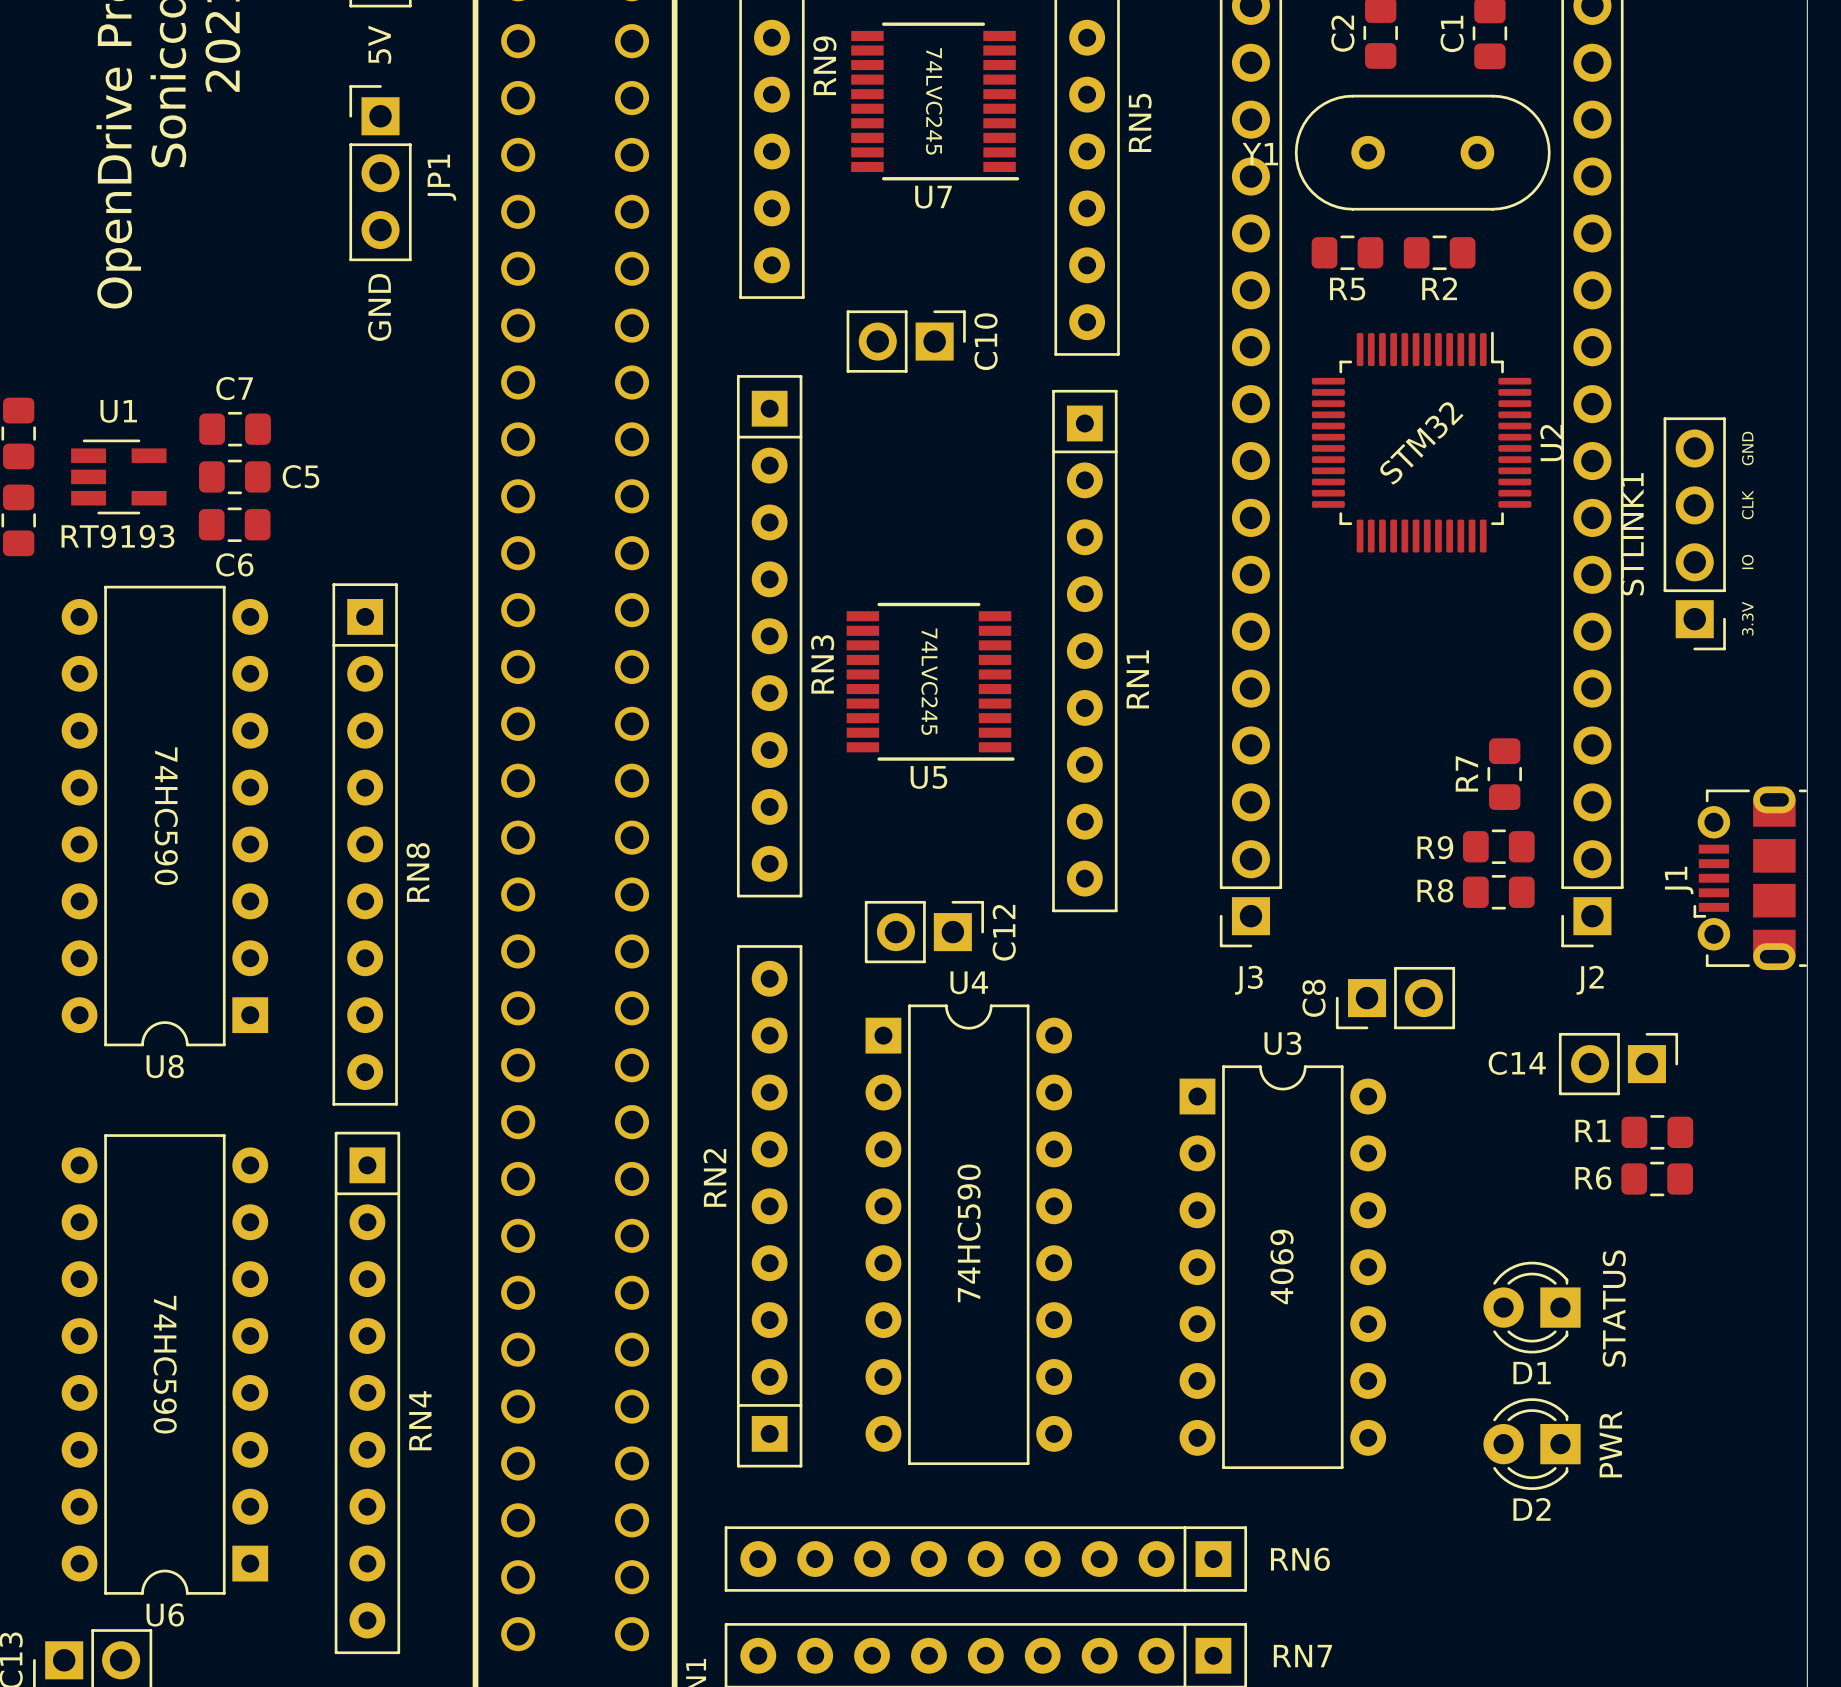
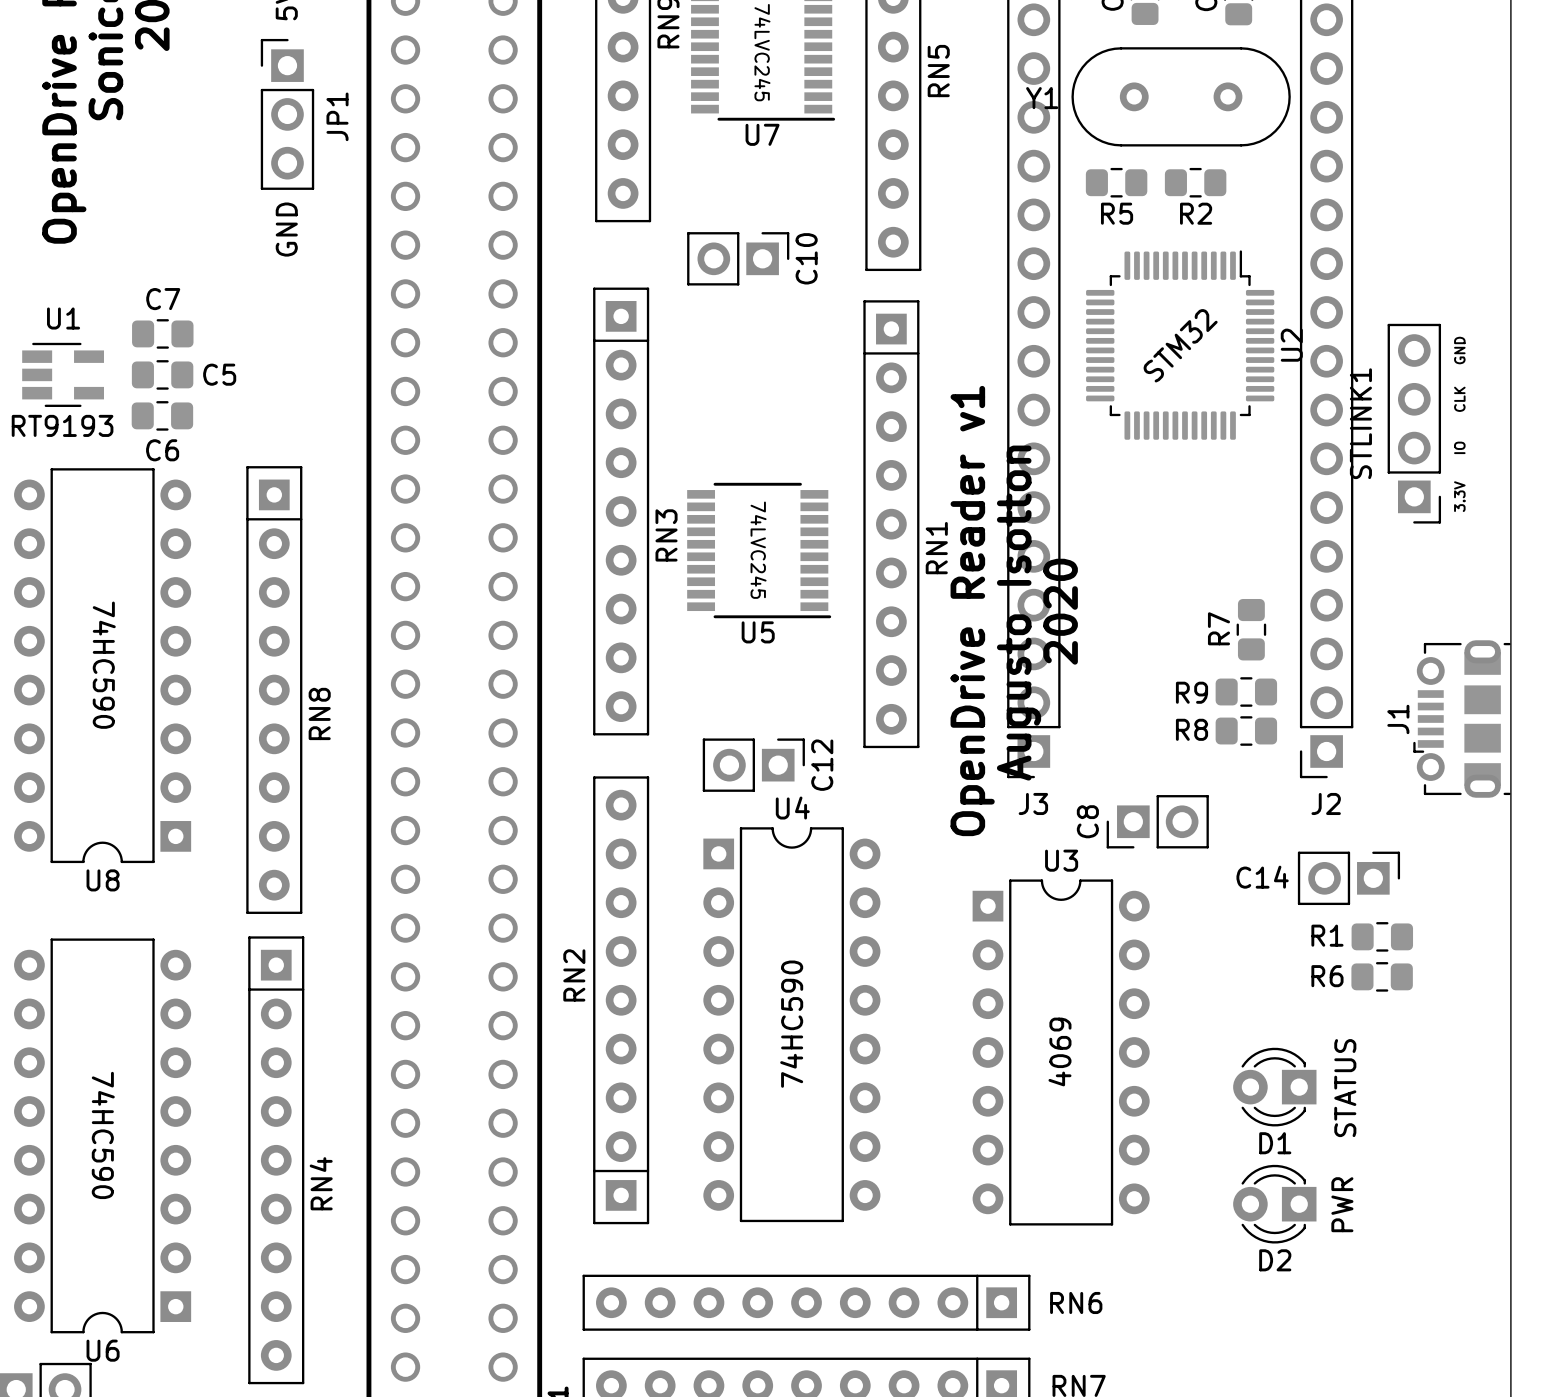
text: none -> 2020 (1060, 611)
text: none -> OpenDrive Reader v1 (972, 611)
text: none -> Augusto Isotton (1019, 613)

